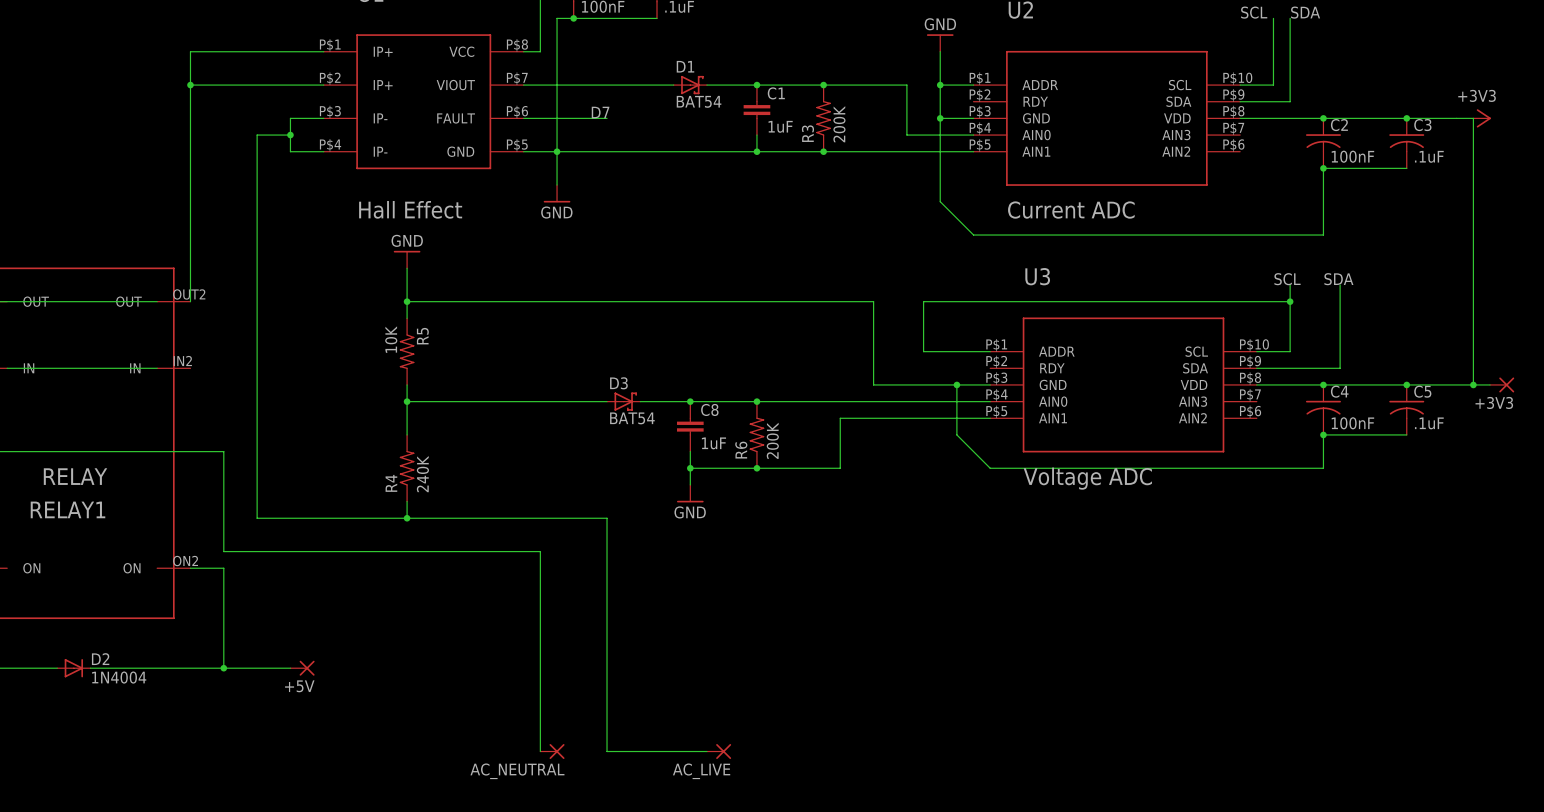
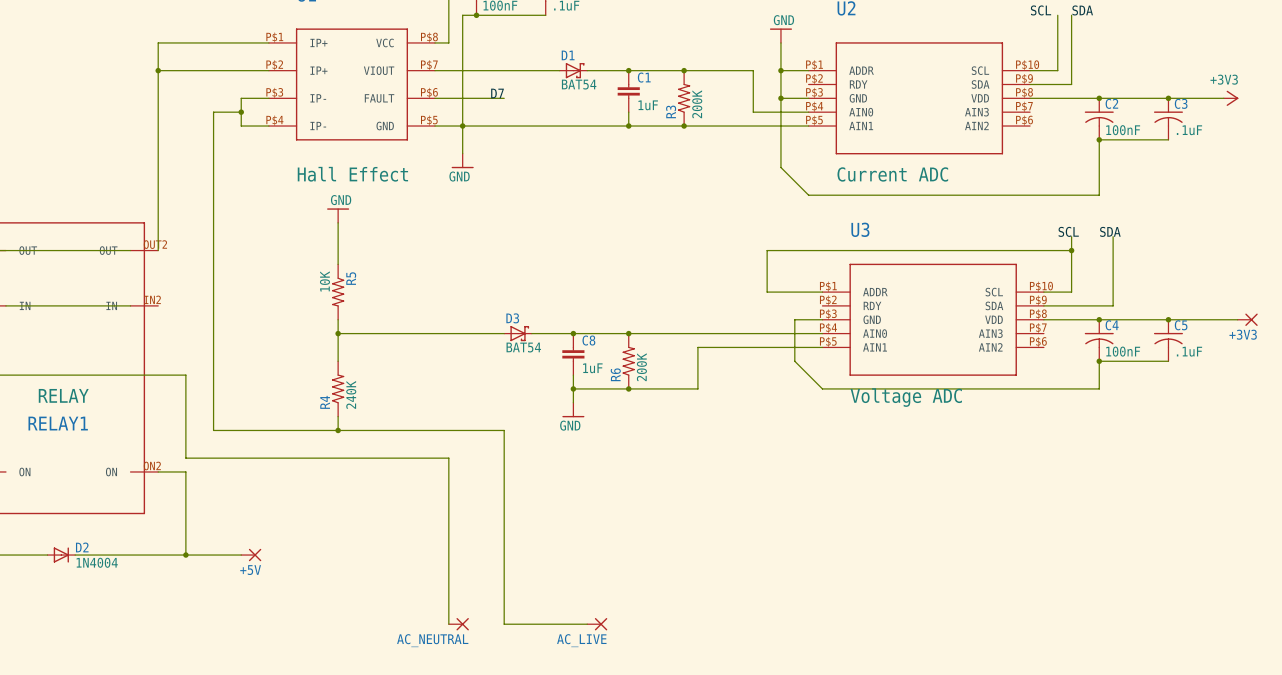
wire: (1473, 118) (1473, 384) -> none
wire: (407, 301) (873, 301) (873, 384) (956, 384) -> none
junction: (407, 301) -> none
junction: (956, 384) -> none
junction: (1473, 384) -> none

